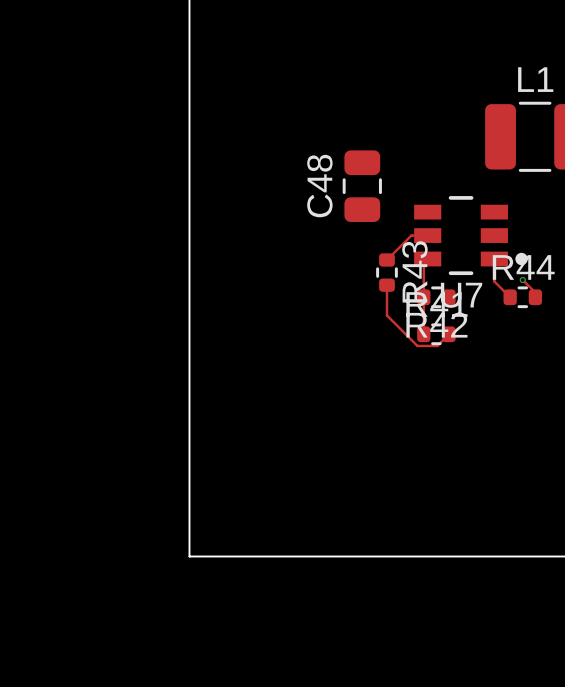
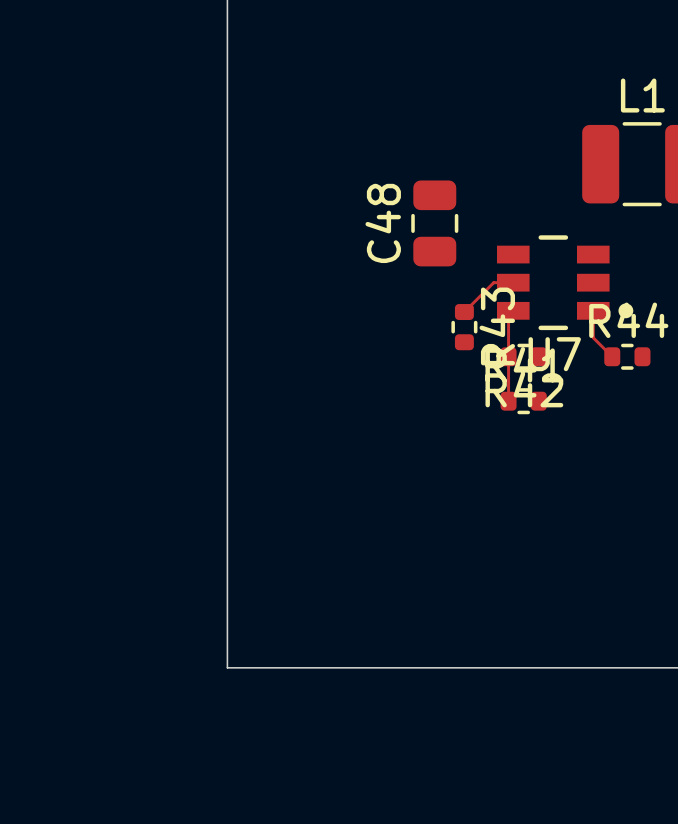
top track: (522, 280) (535, 292) (535, 297) -> none
via: (522, 280) -> none
top track: (386, 285) (386, 315) (417, 345) (437, 345) (448, 334) -> none

